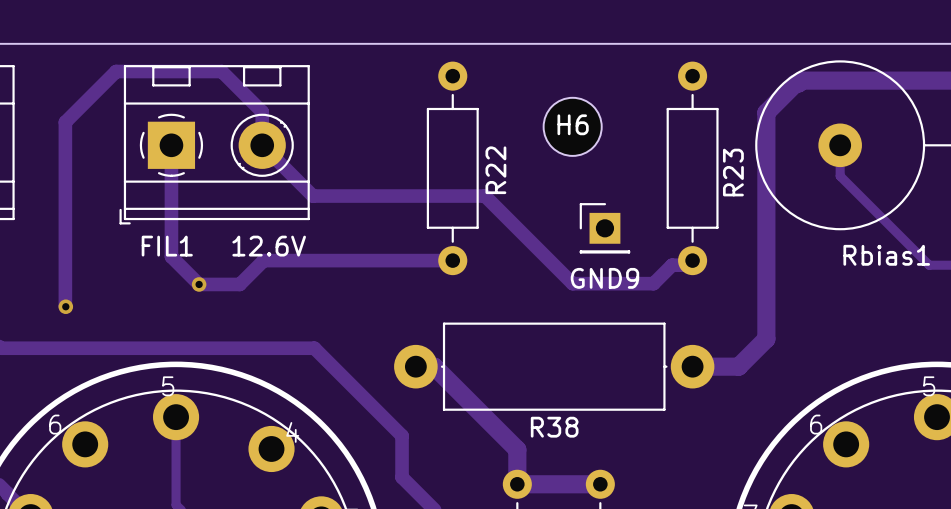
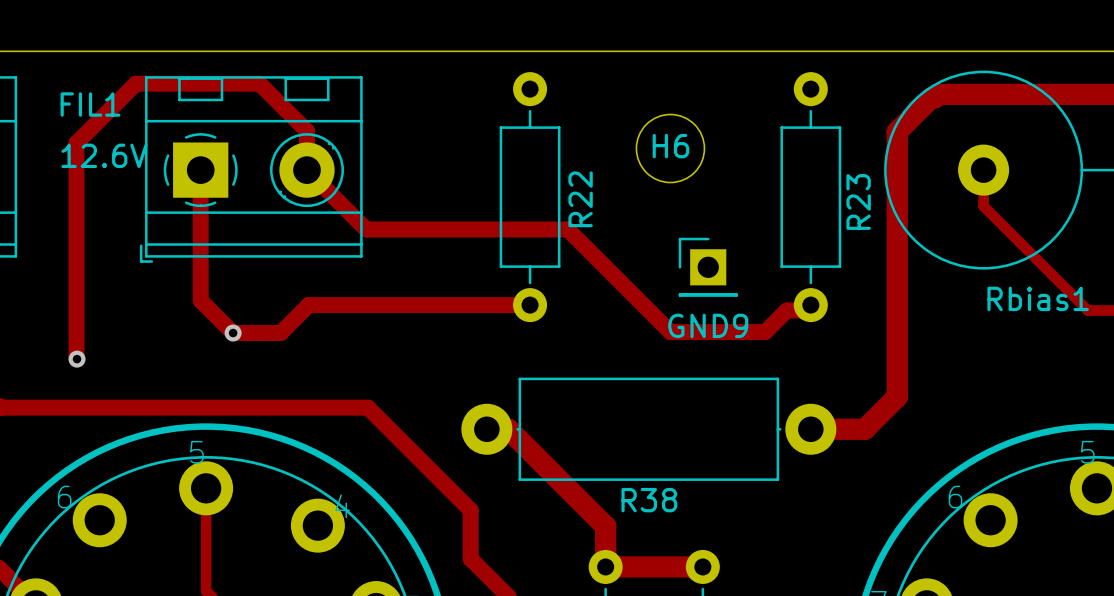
FIL1 name position: FIL1 (167, 246) -> FIL1 (90, 104)
text position: 12.6V (269, 246) -> 12.6V (104, 155)

